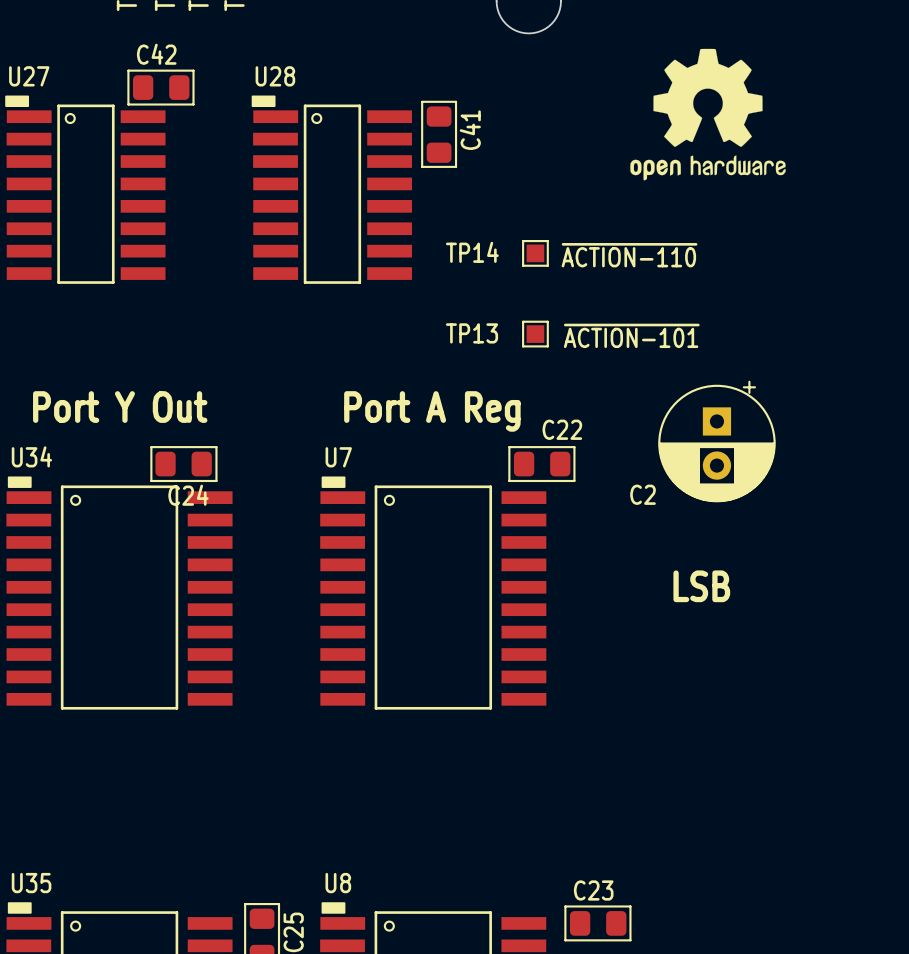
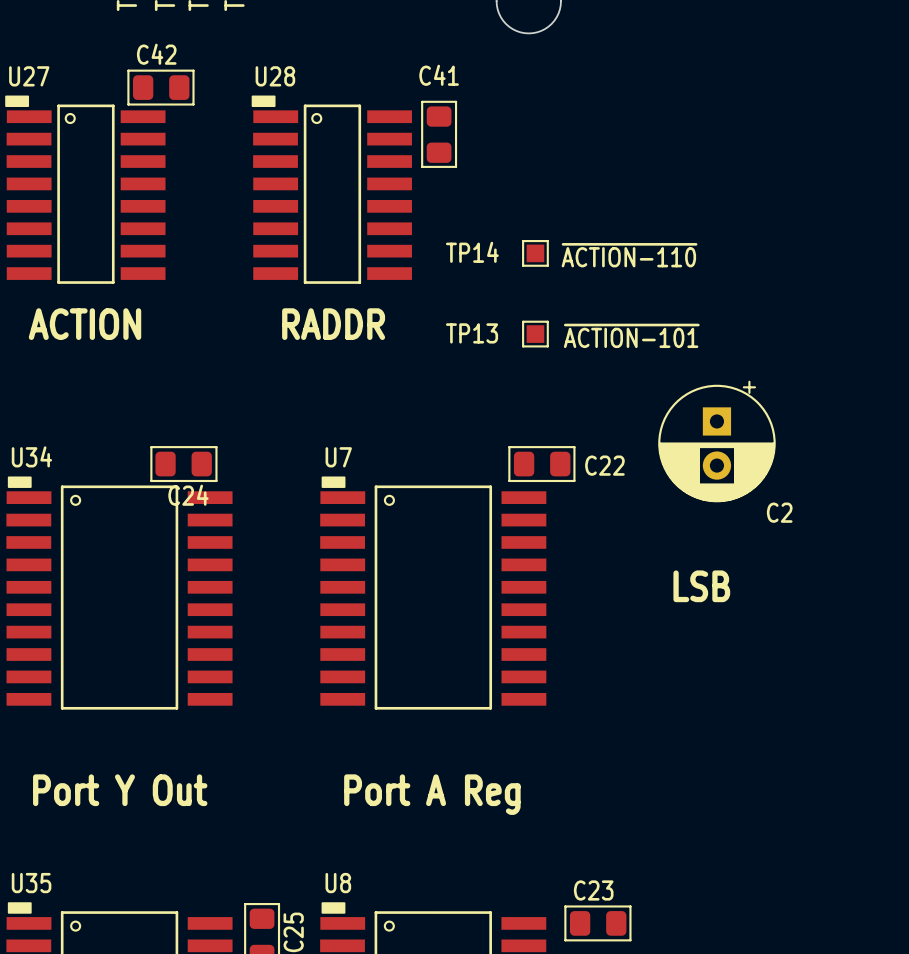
drawing: [630, 48, 786, 181] -> none
C41 name rotation: 0° (470, 130) -> 90° clockwise (439, 75)
C41 name position: C41 (470, 130) -> C41 (439, 75)
text: none -> ACTION (85, 324)
text: none -> RADDR (333, 324)
text position: Port Y Out (120, 407) -> Port Y Out (120, 790)
text position: Port A Reg (432, 411) -> Port A Reg (432, 794)
C22 name position: C22 (562, 429) -> C22 (604, 465)
C2 name position: C2 (643, 494) -> C2 (779, 512)

